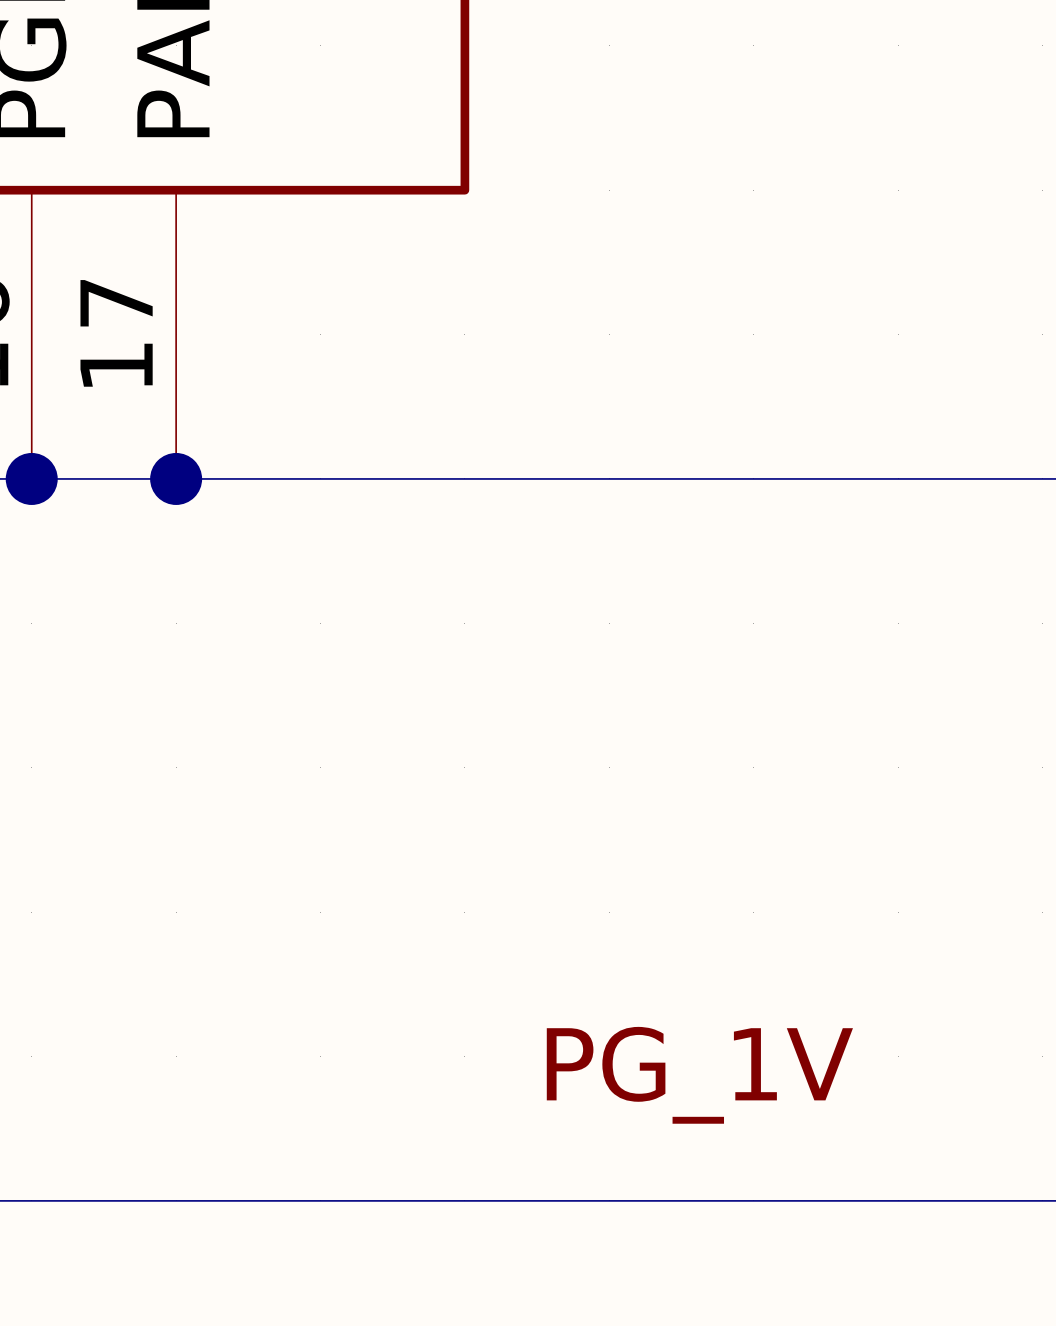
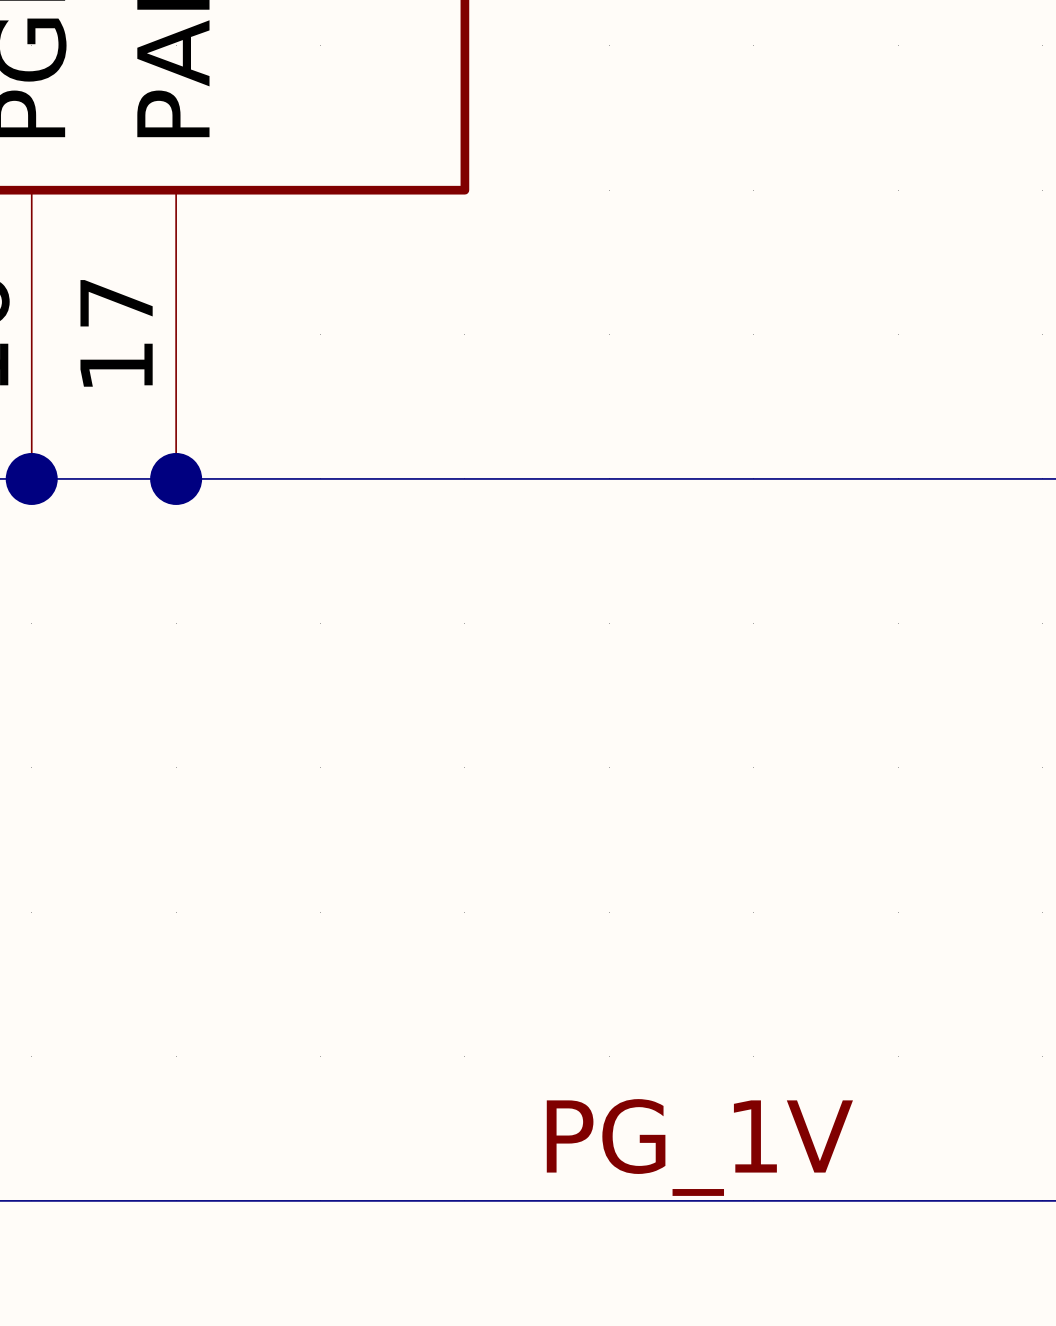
label position: PG_1V (699, 1075) -> PG_1V (699, 1147)

